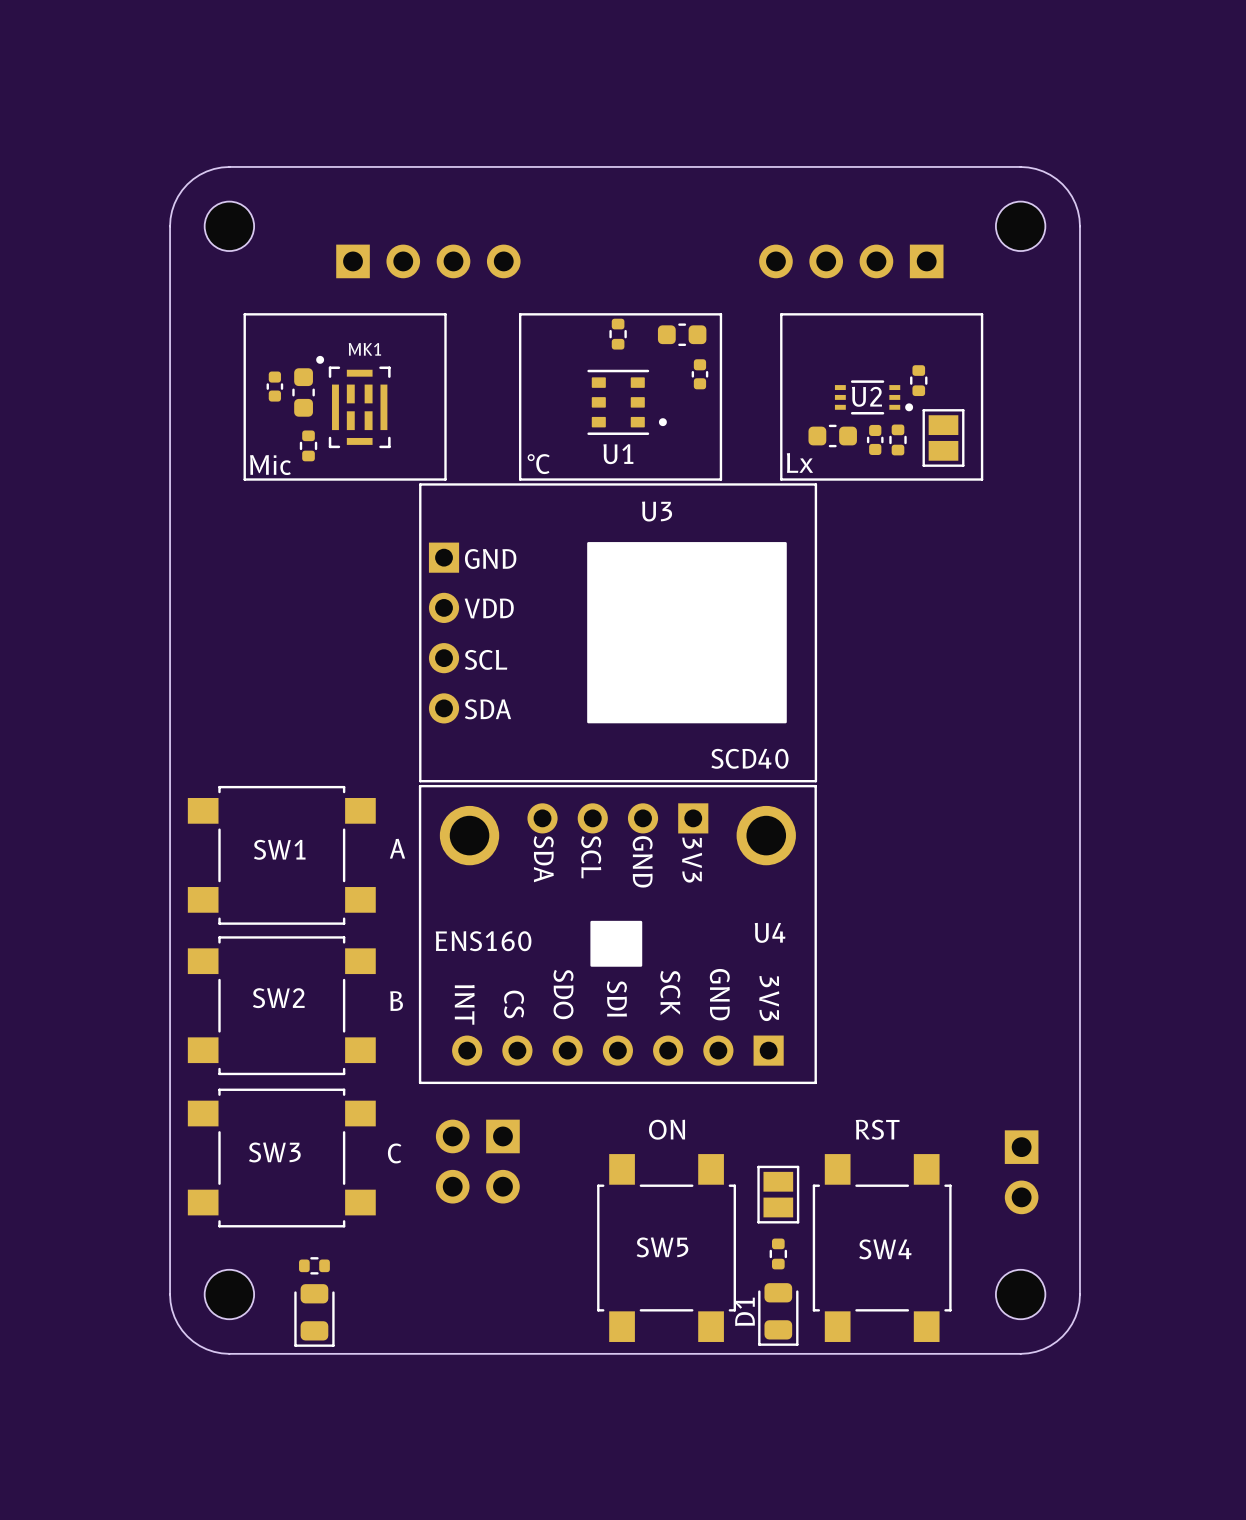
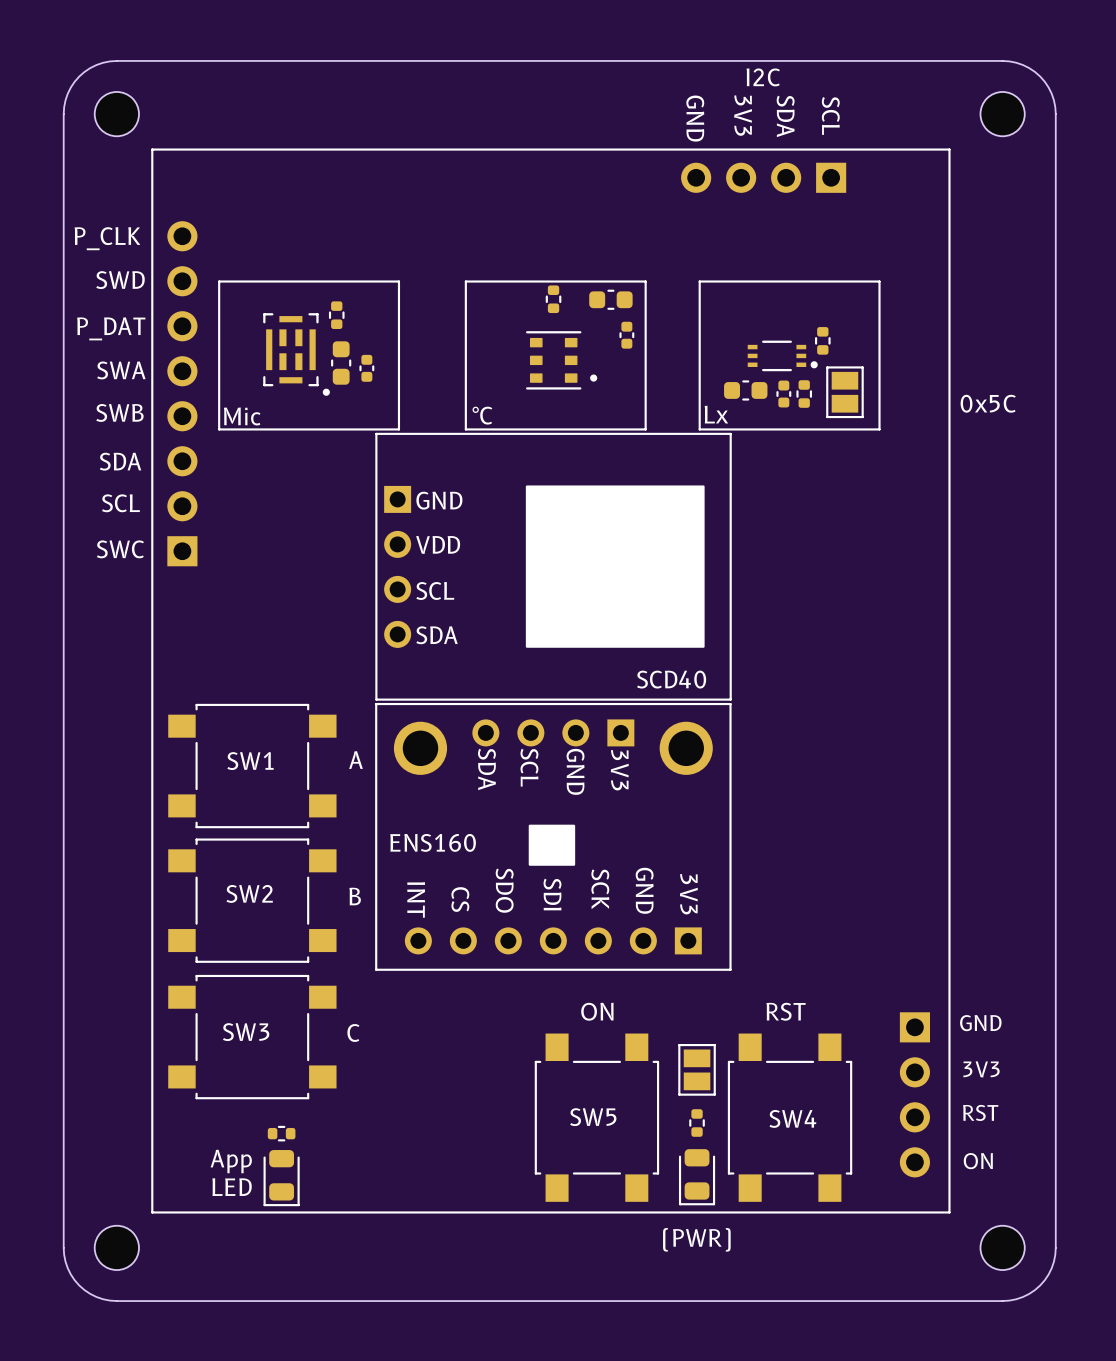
text: none -> I2C (763, 77)
text: none -> 3V3 (743, 115)
text: none -> SDA (785, 116)
text: none -> SCL (830, 116)
text: none -> GND (695, 118)
line: none -> (152, 149) (949, 149) (949, 1212) (152, 1212) (152, 149)
board edge: (229, 166) (1020, 166) (1043, 171) (1056, 179) (1067, 190) (1077, 210) (1079, 226) (1079, 1294) (1075, 1317) (1067, 1330) (1056, 1341) (1043, 1349) (1020, 1353) (229, 1353) (206, 1349) (193, 1341) (182, 1330) (172, 1309) (170, 1294) (170, 226) (174, 203) (187, 184) (206, 171) (229, 166) -> (116, 60) (96, 65) (79, 76) (67, 93) (63, 114) (63, 1247) (65, 1261) (74, 1280) (84, 1290) (96, 1297) (116, 1301) (1002, 1301) (1016, 1299) (1034, 1290) (1044, 1280) (1051, 1268) (1055, 1247) (1055, 114) (1051, 93) (1044, 81) (1029, 68) (1016, 62) (1002, 60) (116, 60)
part position: (229, 226) -> (116, 114)
part position: (1020, 226) -> (1002, 114)
part: (428, 261) -> none
part position: (851, 261) -> (763, 177)
text: none -> P_CLK (107, 238)
text: none -> SWD (120, 280)
text: none -> P_DAT (111, 328)
part position: (274, 386) -> (366, 368)
part position: (303, 392) -> (341, 363)
part: none -> (296, 354)
U2 name: U2 (866, 396) -> none
MK1: (353, 402) -> none
text: none -> SWA (121, 370)
part: none -> (182, 393)
part position: (308, 445) -> (336, 315)
text: none -> 0x5C (988, 403)
U1 name: U1 (618, 454) -> none
text: none -> SWB (119, 412)
U3 name: U3 (657, 511) -> none
text: none -> SDA (120, 461)
text: none -> SCL (120, 503)
text: none -> SWC (120, 549)
U4 name: U4 (770, 932) -> none
text: none -> GND (980, 1023)
part: (477, 1161) -> none
text: none -> 3V3 (981, 1069)
part: none -> (914, 1094)
text: none -> RST (980, 1112)
part position: (229, 1294) -> (116, 1247)
part position: (1020, 1294) -> (1002, 1247)
text: none -> App (231, 1161)
text: none -> ON (978, 1161)
D1 name: D1 (744, 1311) -> none
text: none -> LED (232, 1187)
text: none -> (PWR) (696, 1239)

